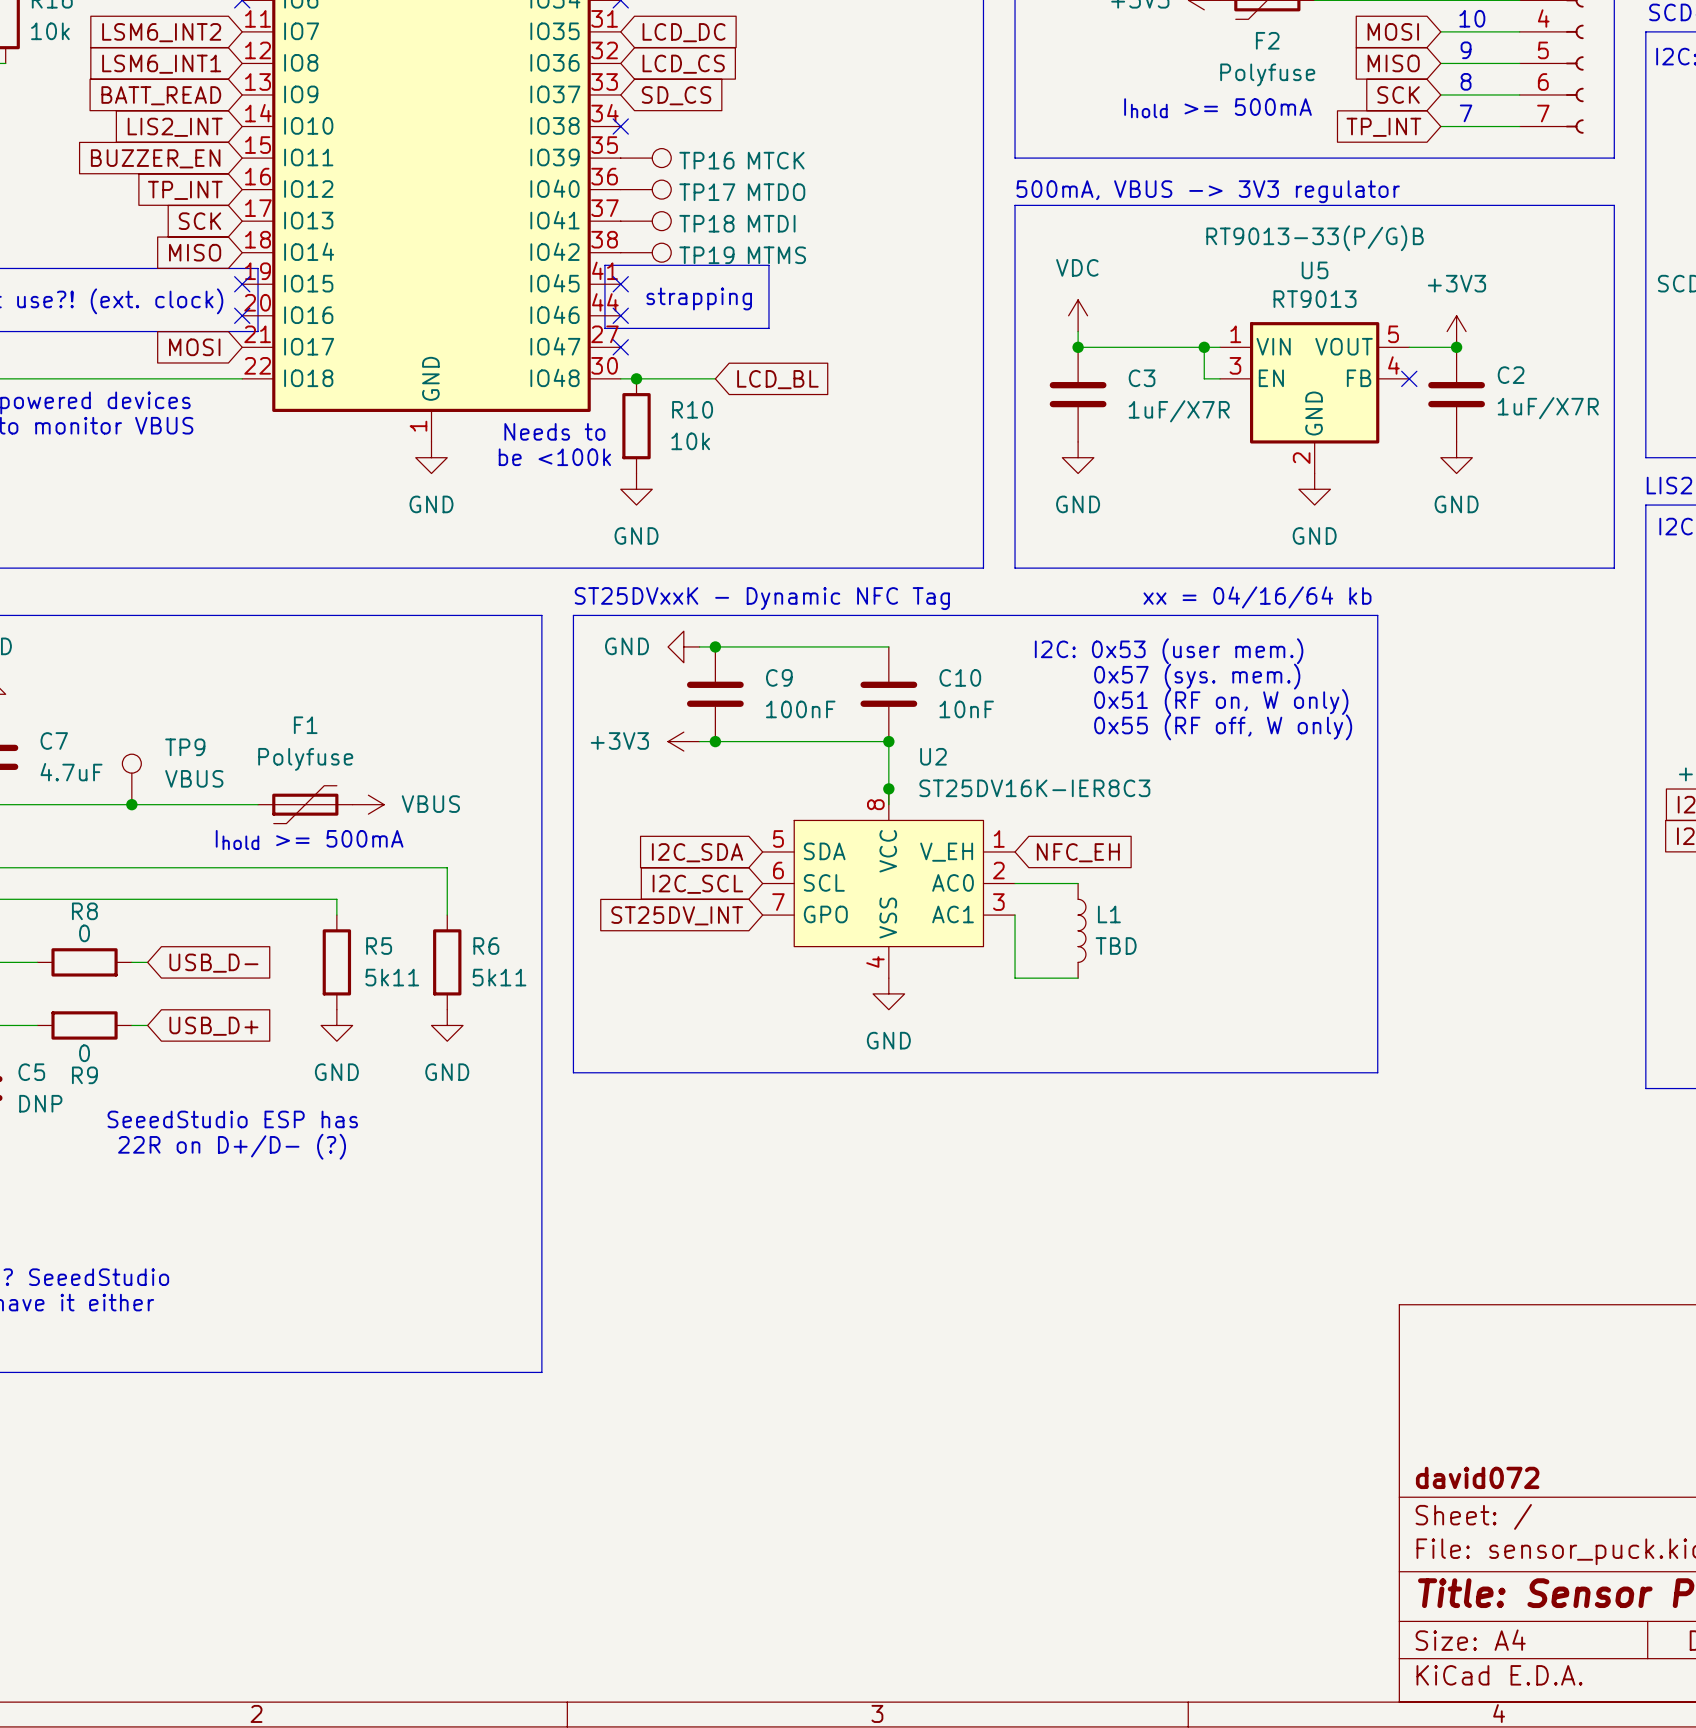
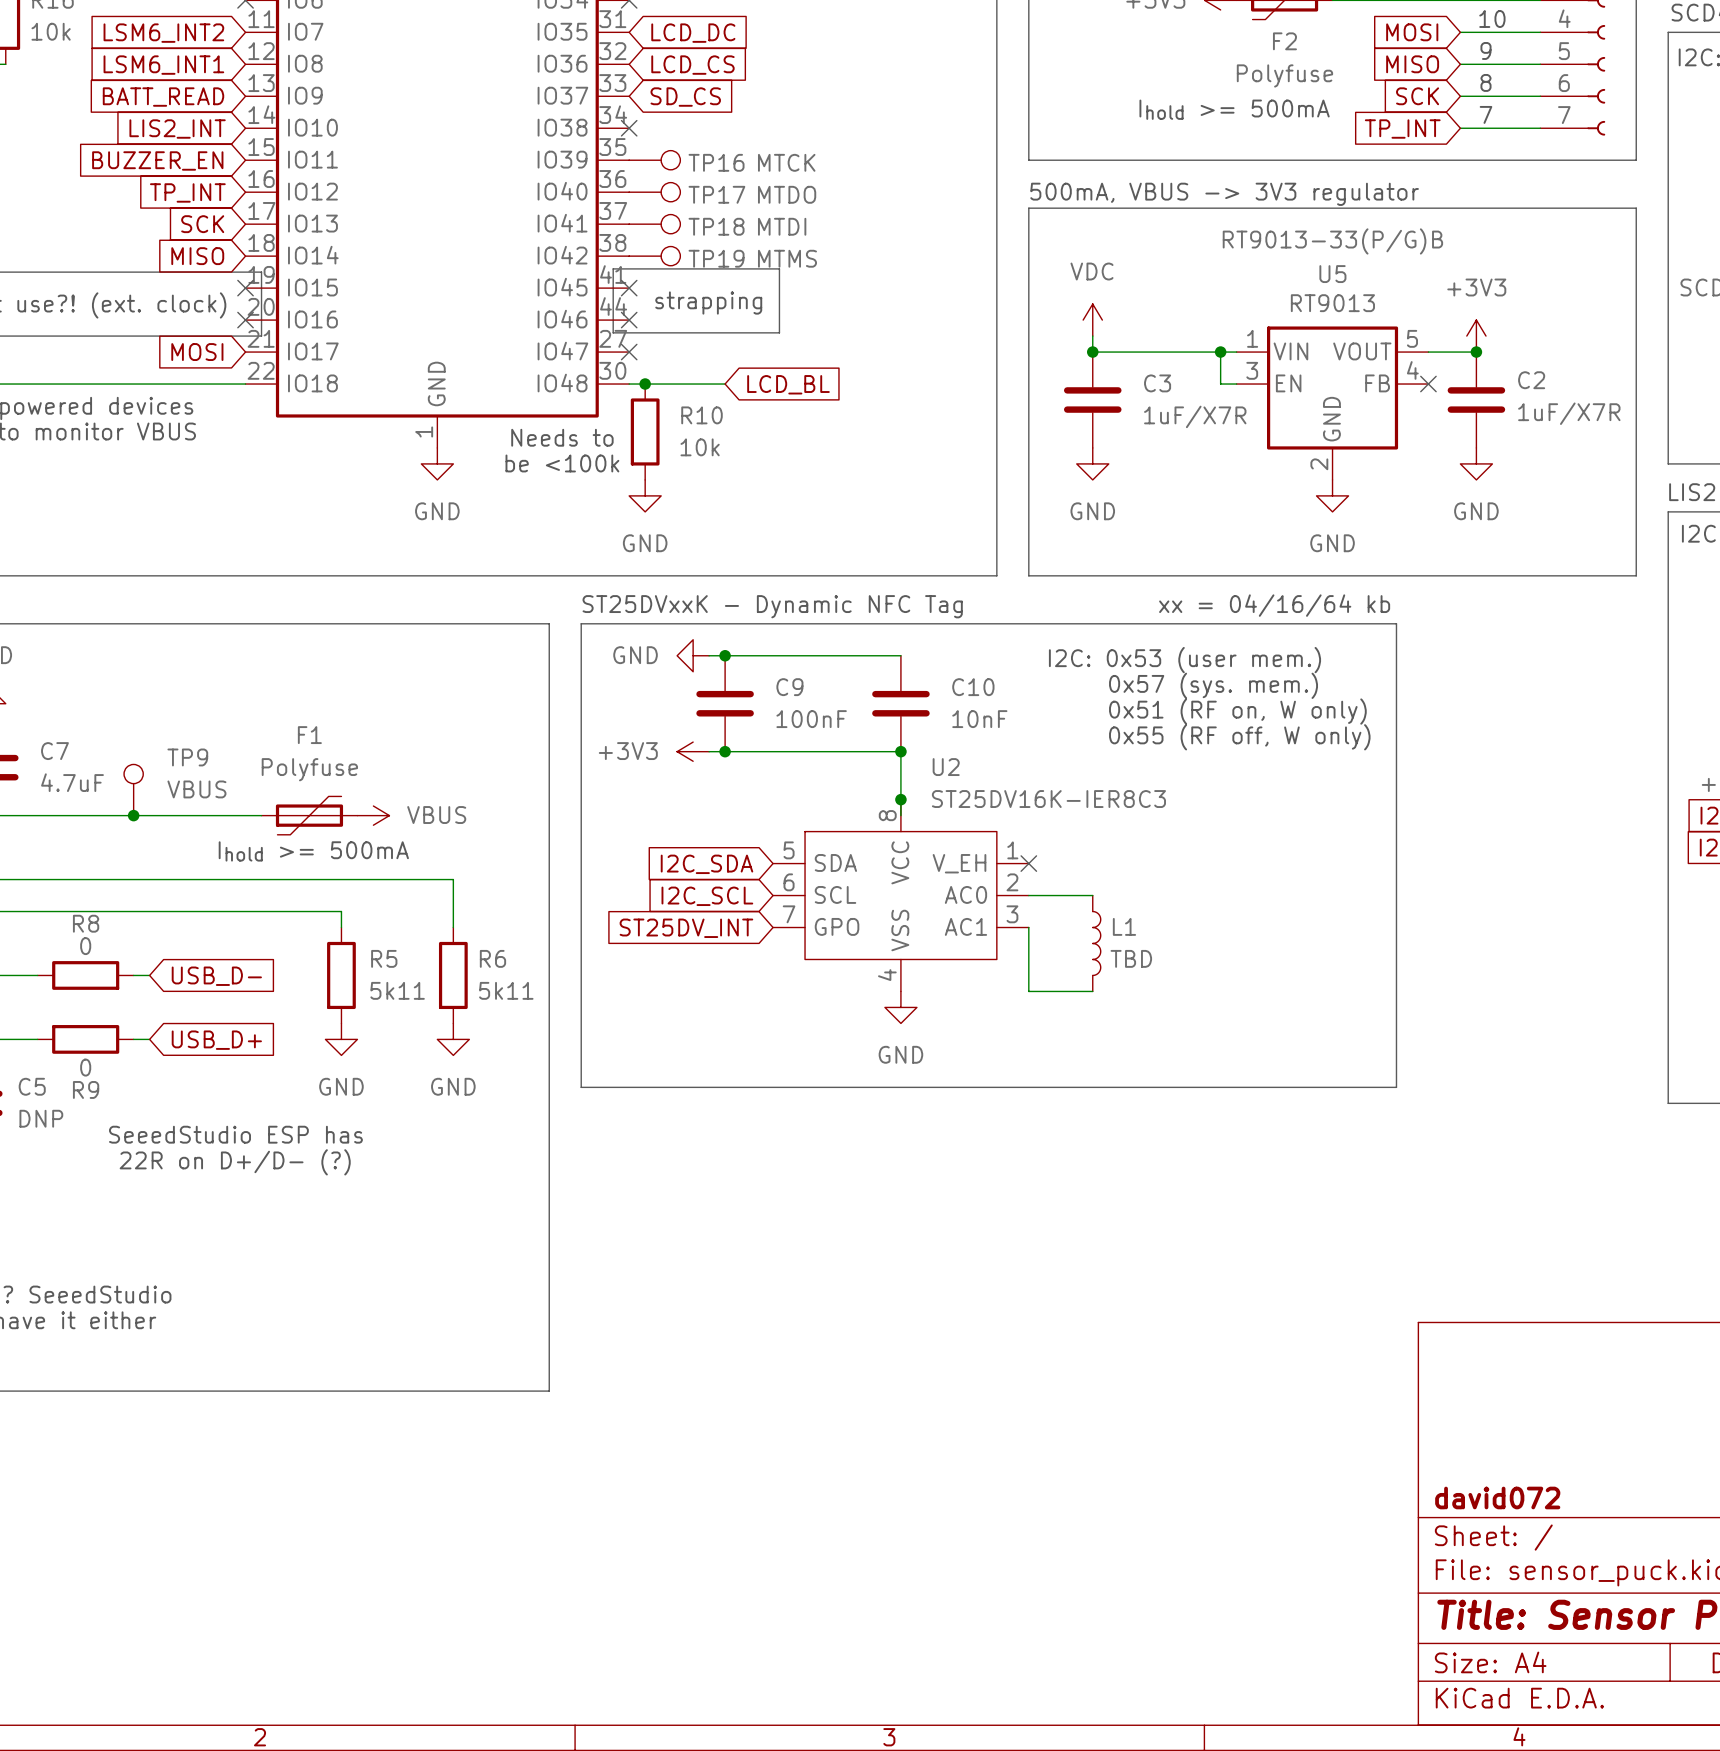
no-connect mark: none -> (1028, 863)
global label: NFC_EH (1078, 852) -> none

